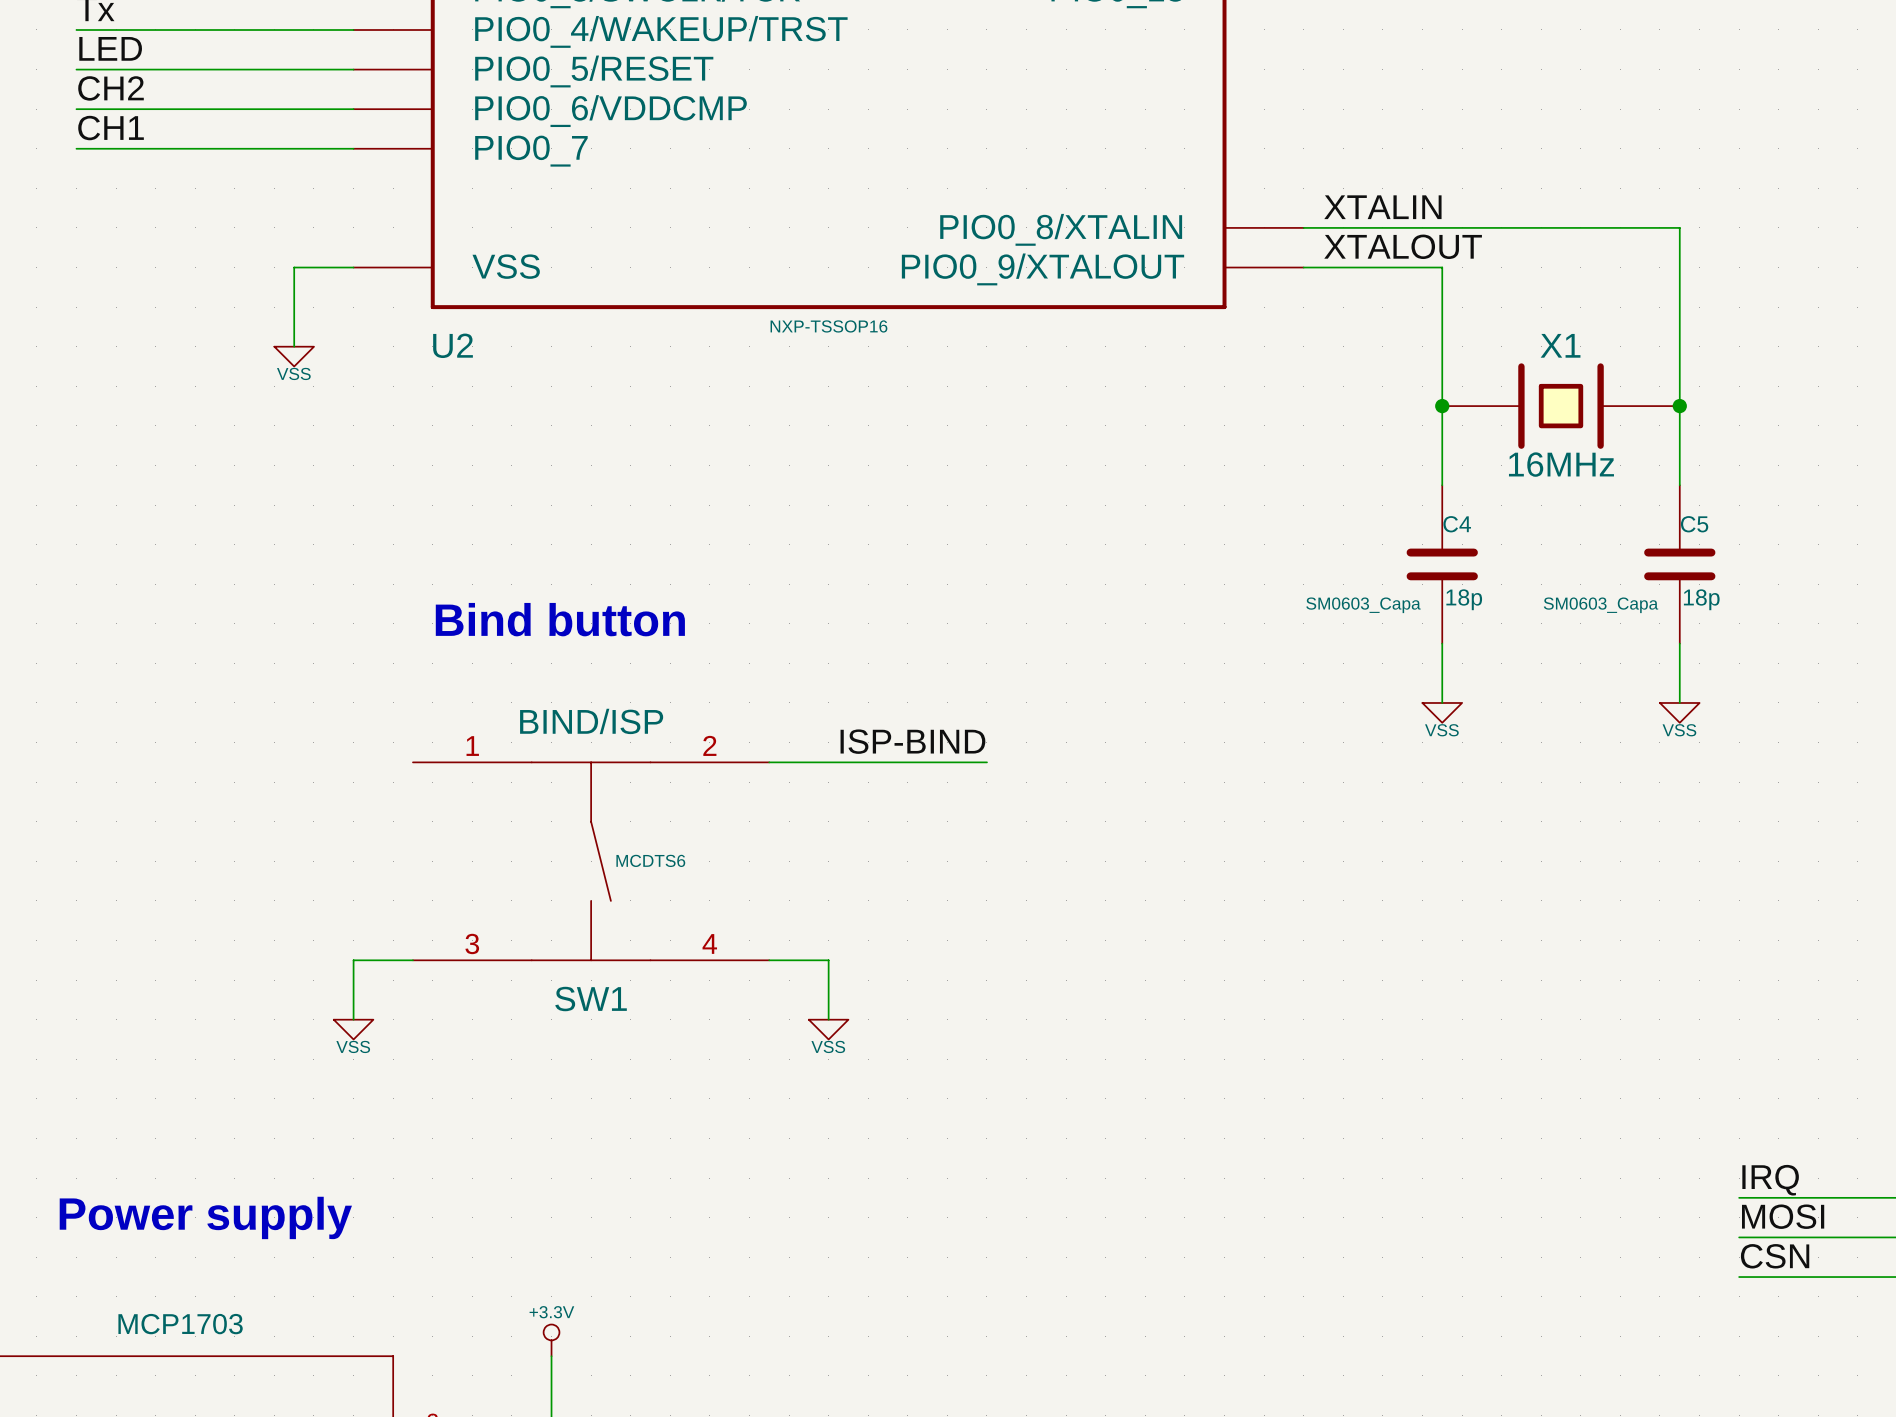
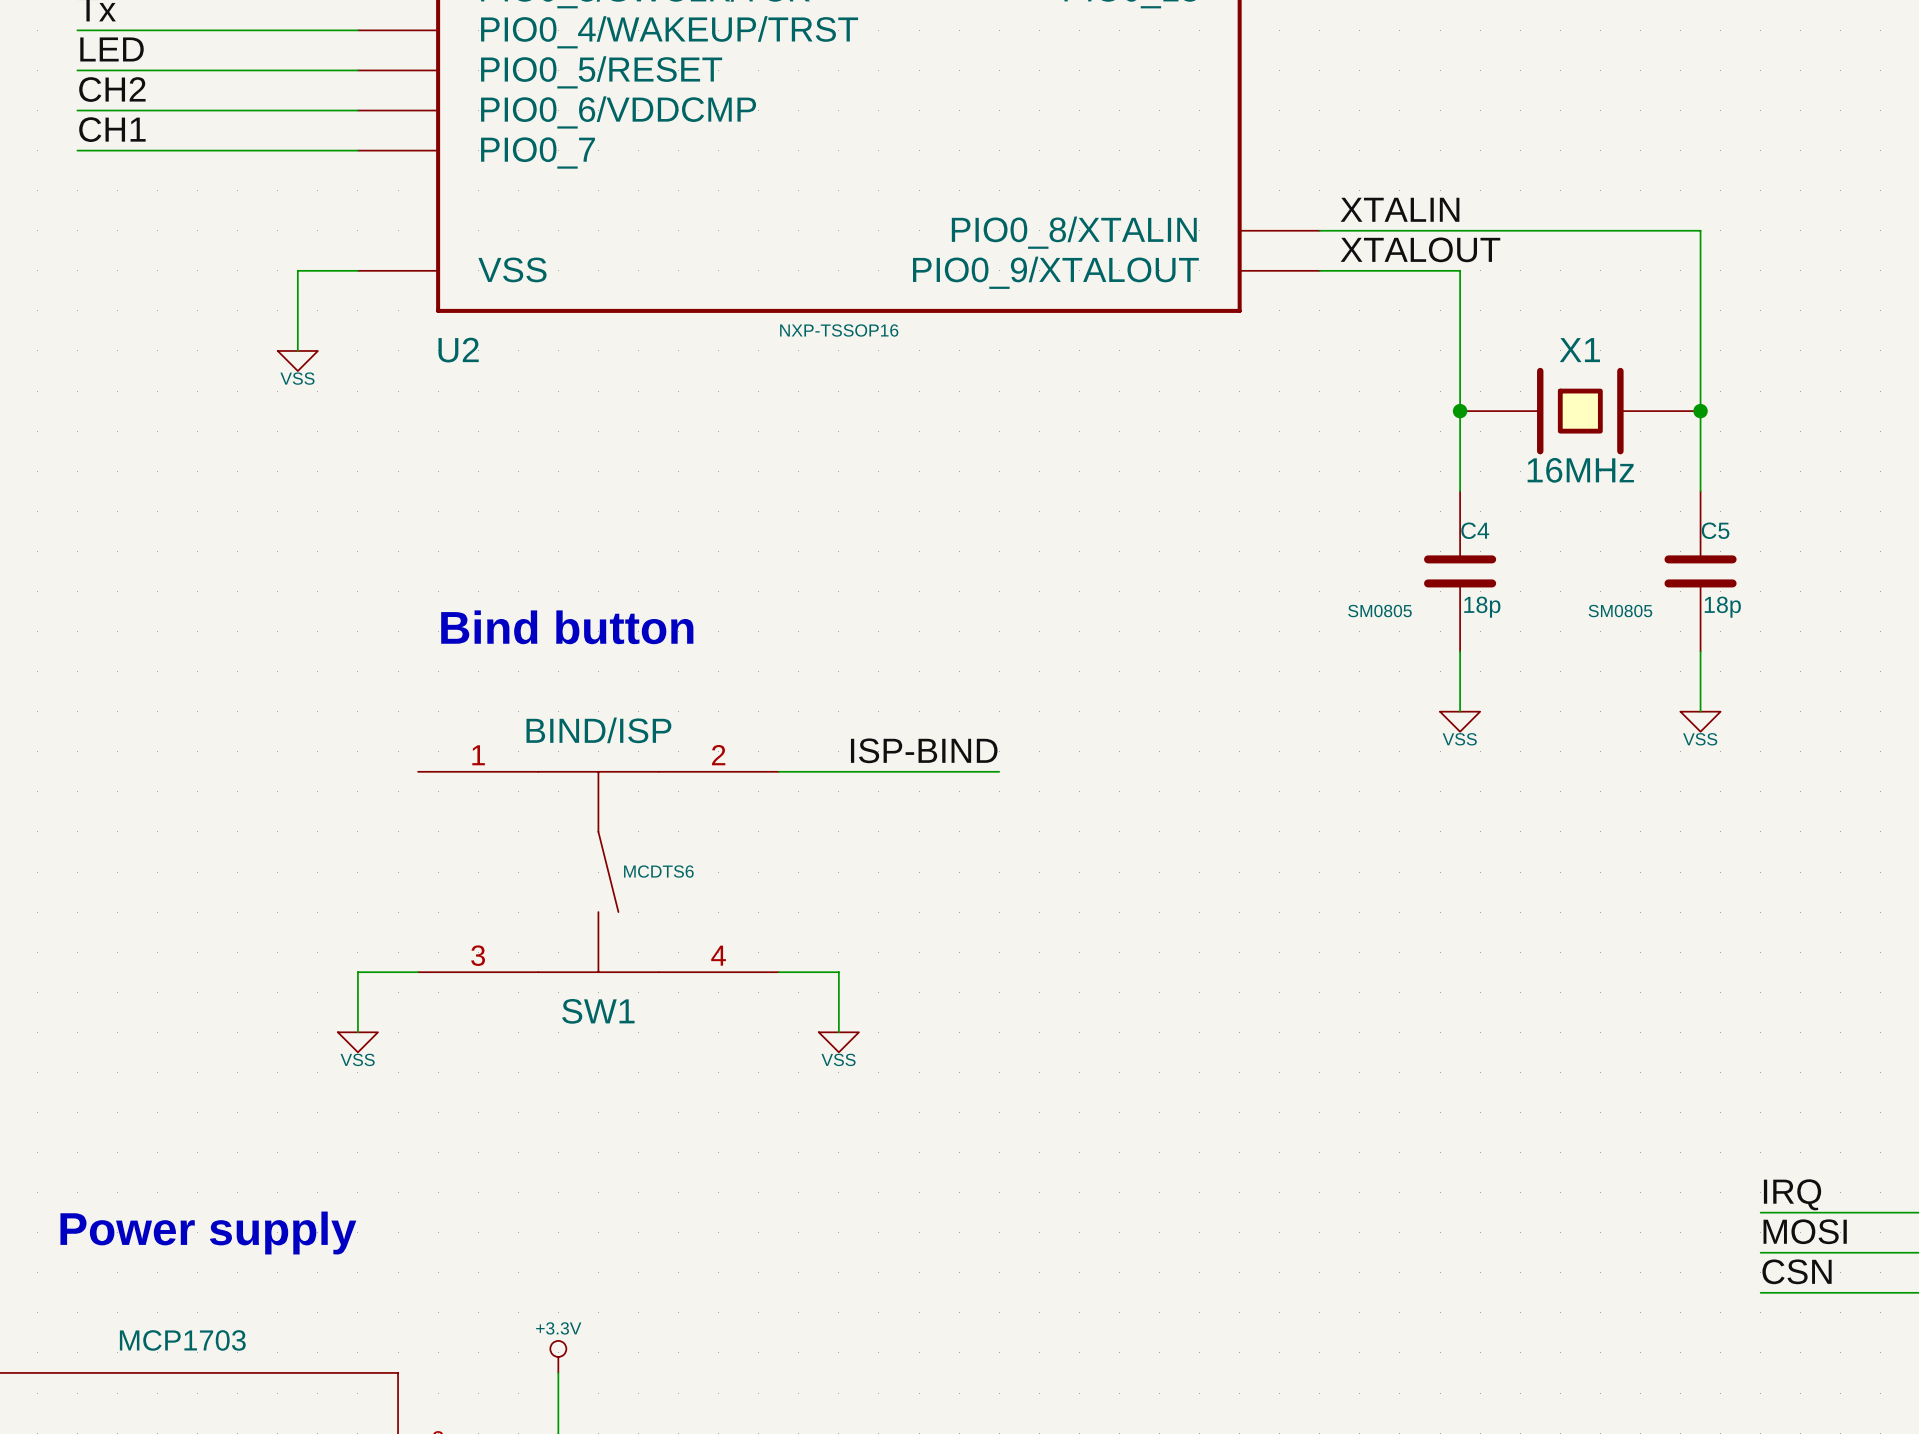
C4 text: SM0603_Capa (1363, 605) -> SM0805 (1379, 611)
C5 text: SM0603_Capa (1600, 605) -> SM0805 (1620, 611)

